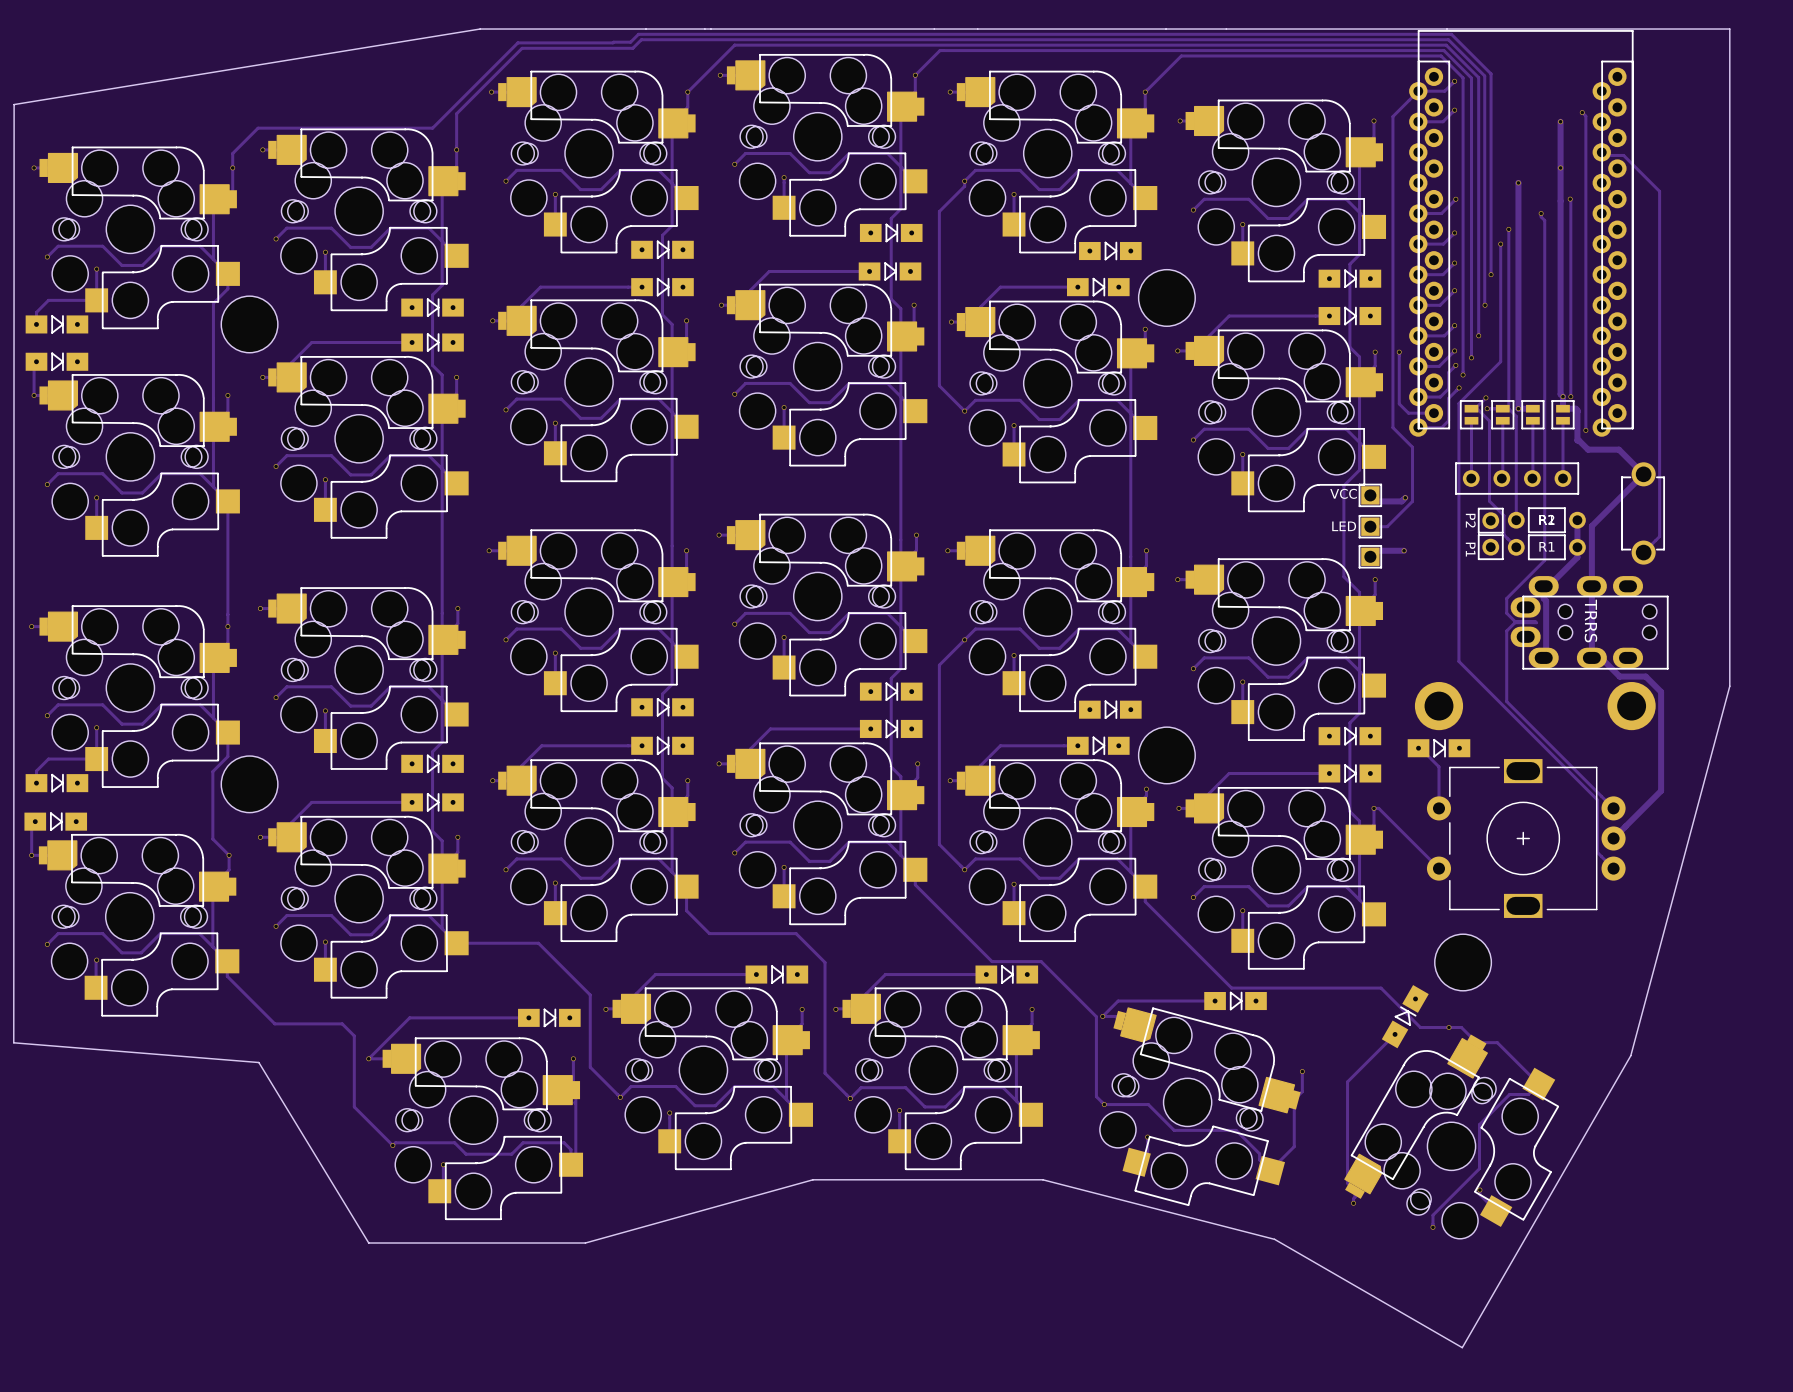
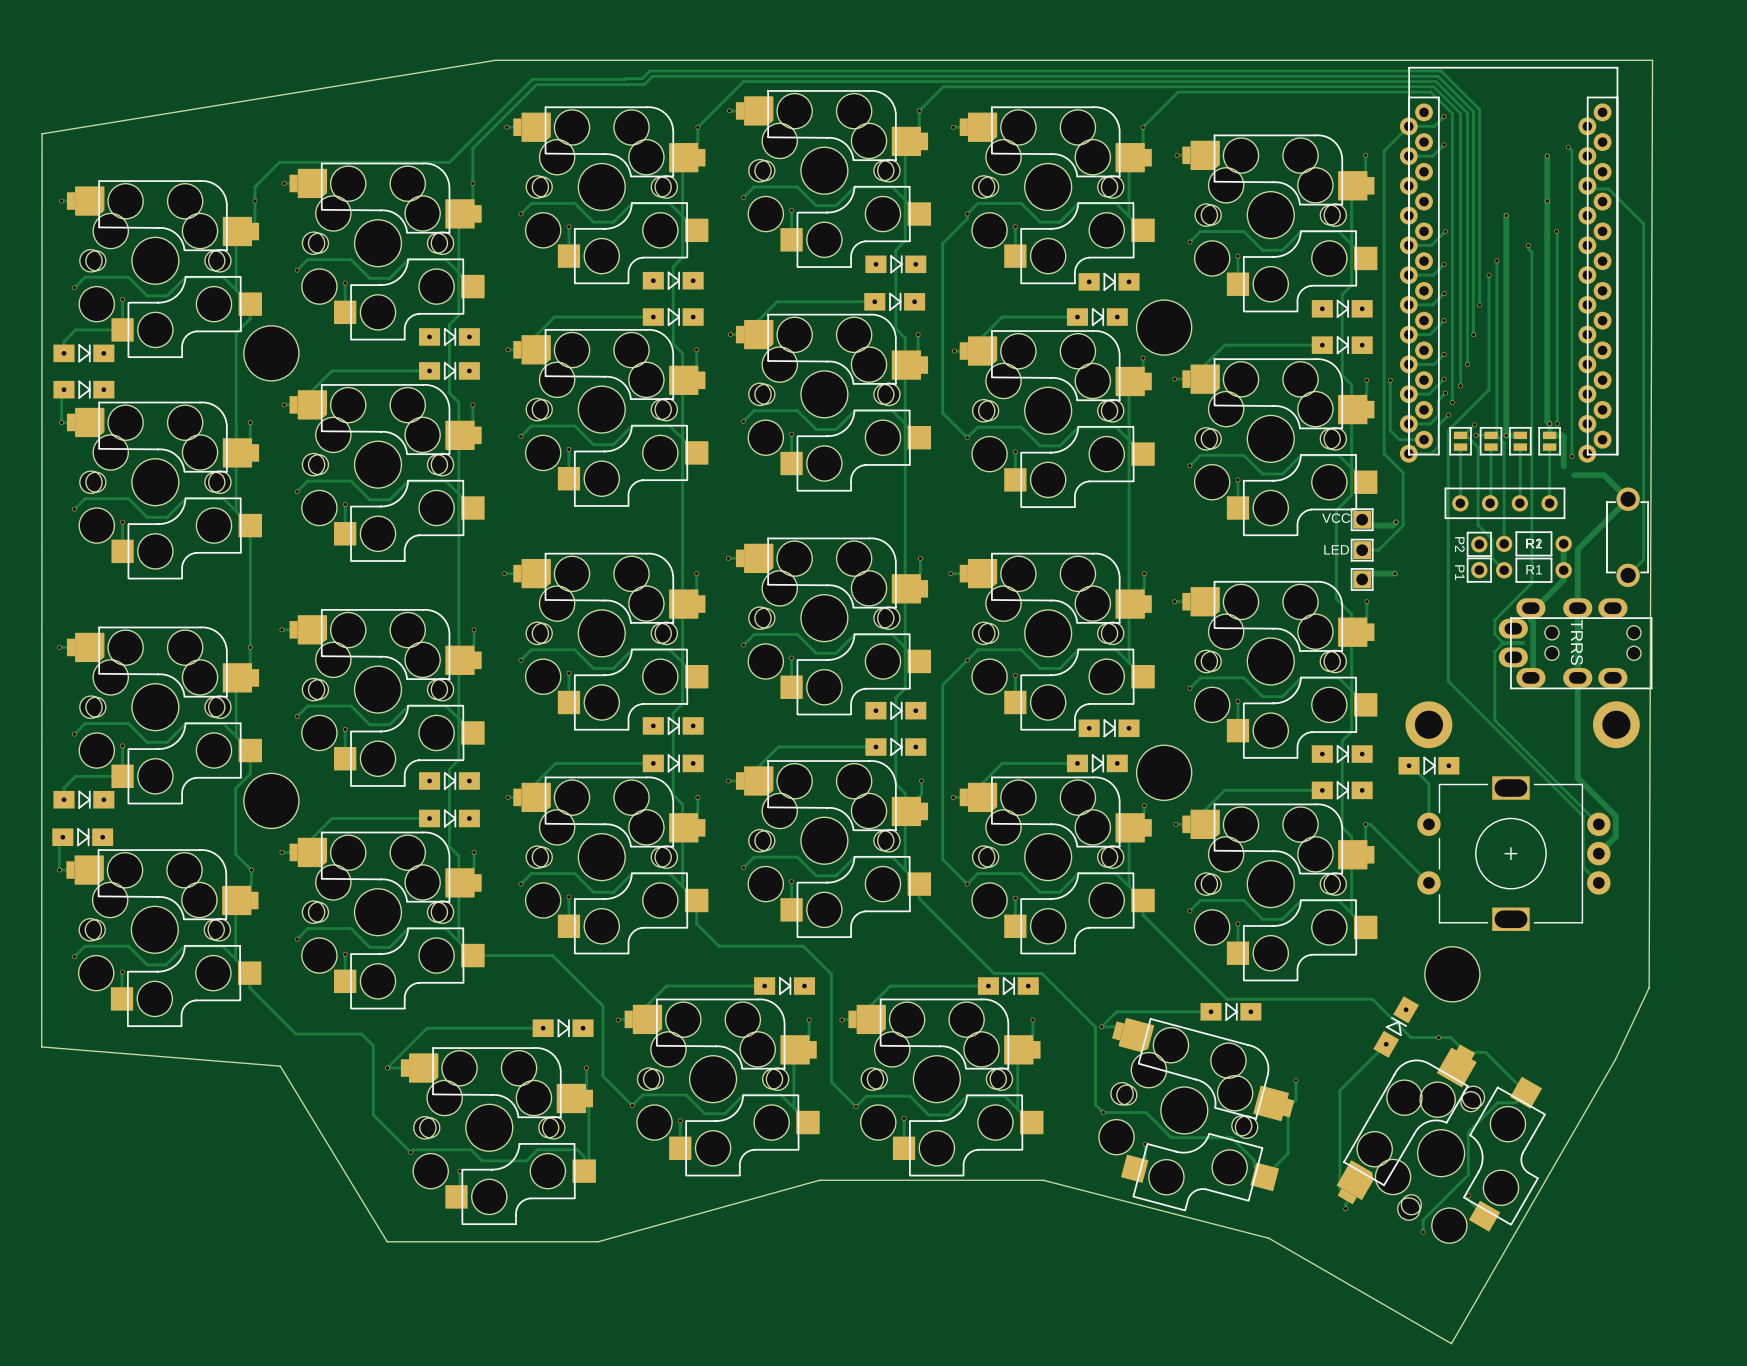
board edge: (1729, 29) (480, 29) (14, 104) (13, 1042) (258, 1062) (368, 1243) (585, 1243) (812, 1179) (1042, 1179) (1274, 1239) (1462, 1347) (1630, 1055) (1729, 686) (1729, 29) -> (1652, 60) (1649, 987) (1615, 1059) (1451, 1343) (1268, 1238) (1043, 1180) (819, 1180) (598, 1241) (387, 1241) (280, 1066) (41, 1046) (42, 133) (495, 60) (1652, 60)
track: (1577, 440) (1588, 449) -> none
track: (1601, 657) (1619, 676) (1645, 676) (1661, 691) (1661, 790) (1631, 821) -> (1577, 677) (1577, 778) (1615, 816) (1615, 836)

